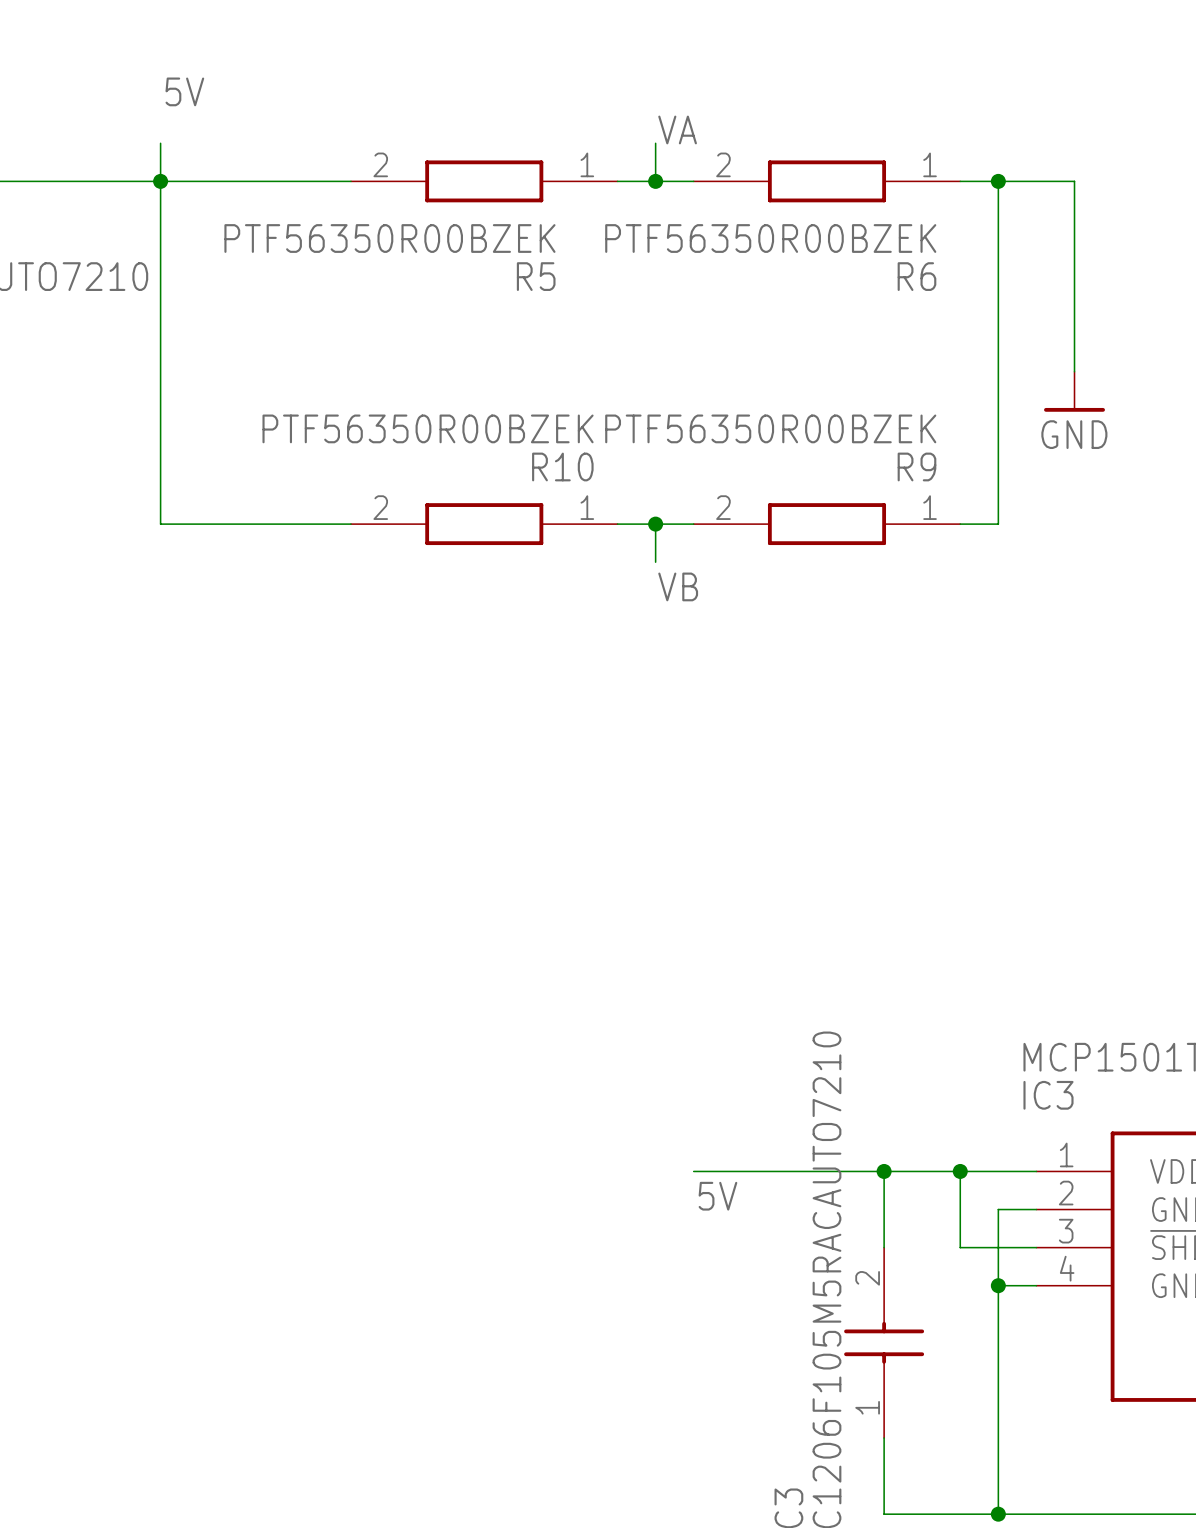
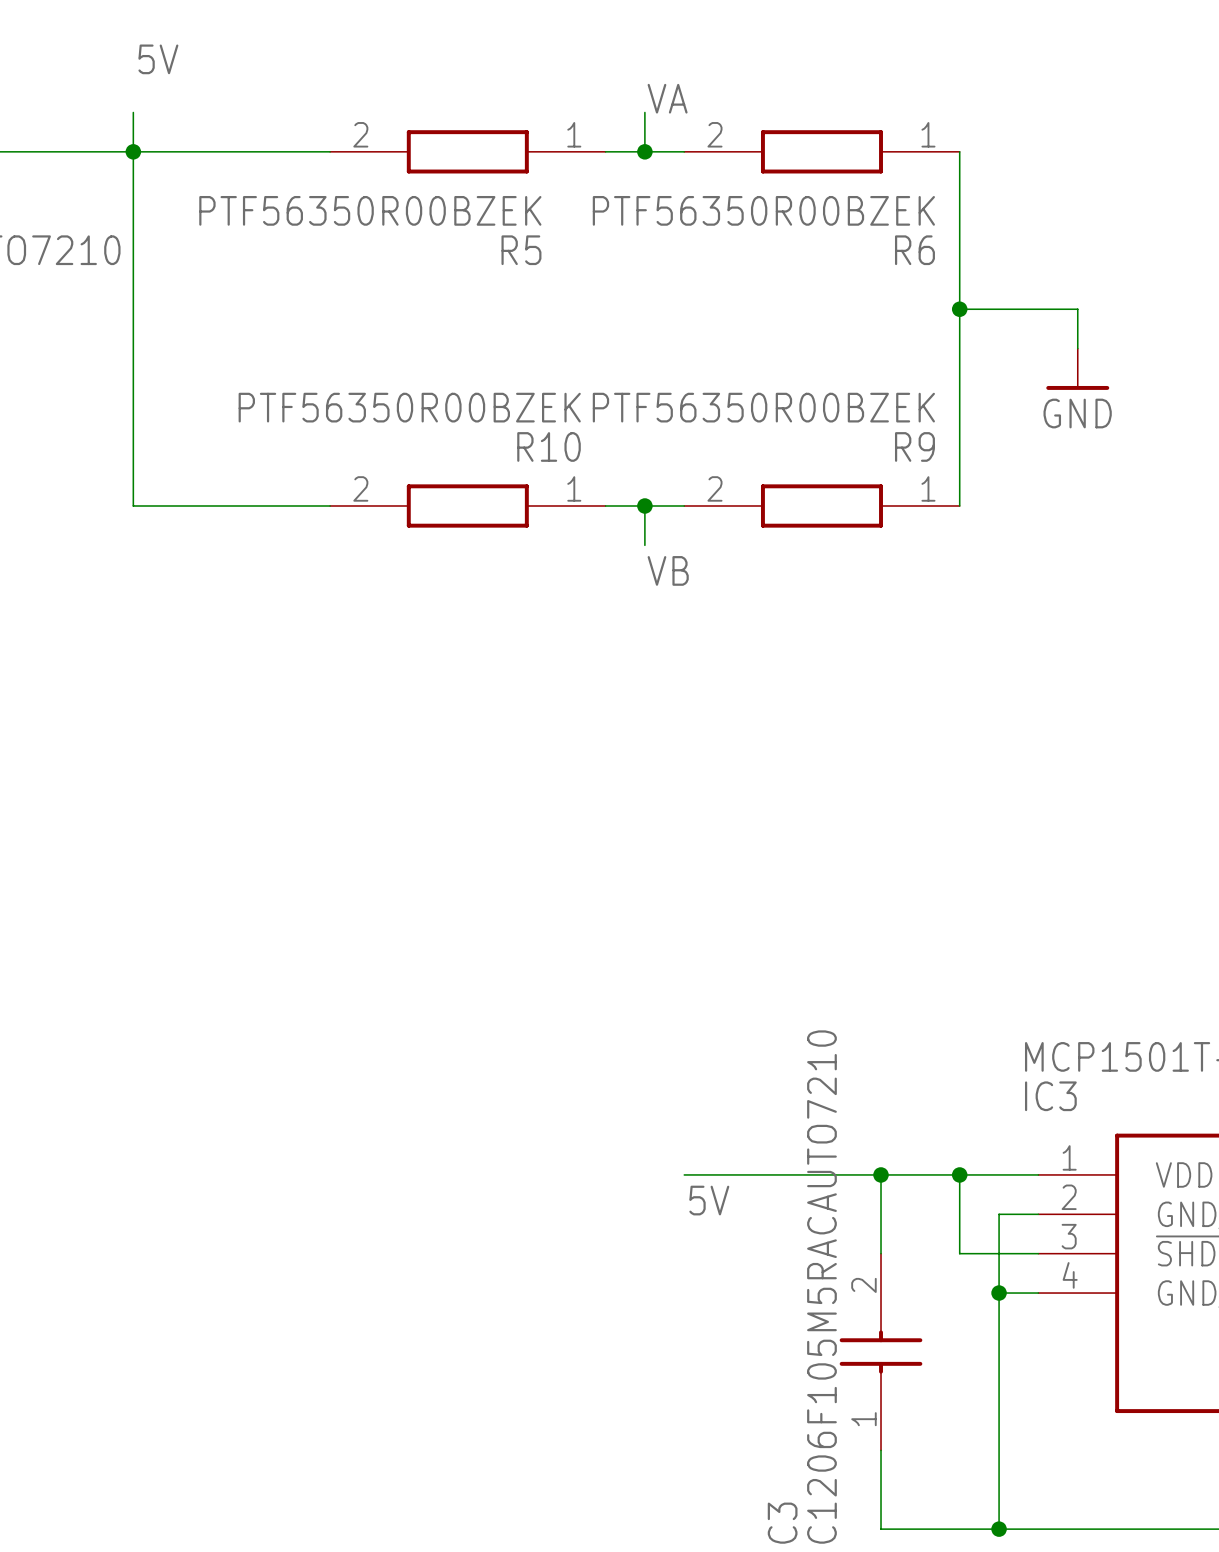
wire: (960, 181) (1074, 181) (1074, 333) -> (959, 309) (1077, 309)
wire: (998, 181) (998, 524) (960, 524) -> (959, 151) (959, 506)
junction: (998, 181) -> none
junction: none -> (959, 309)

